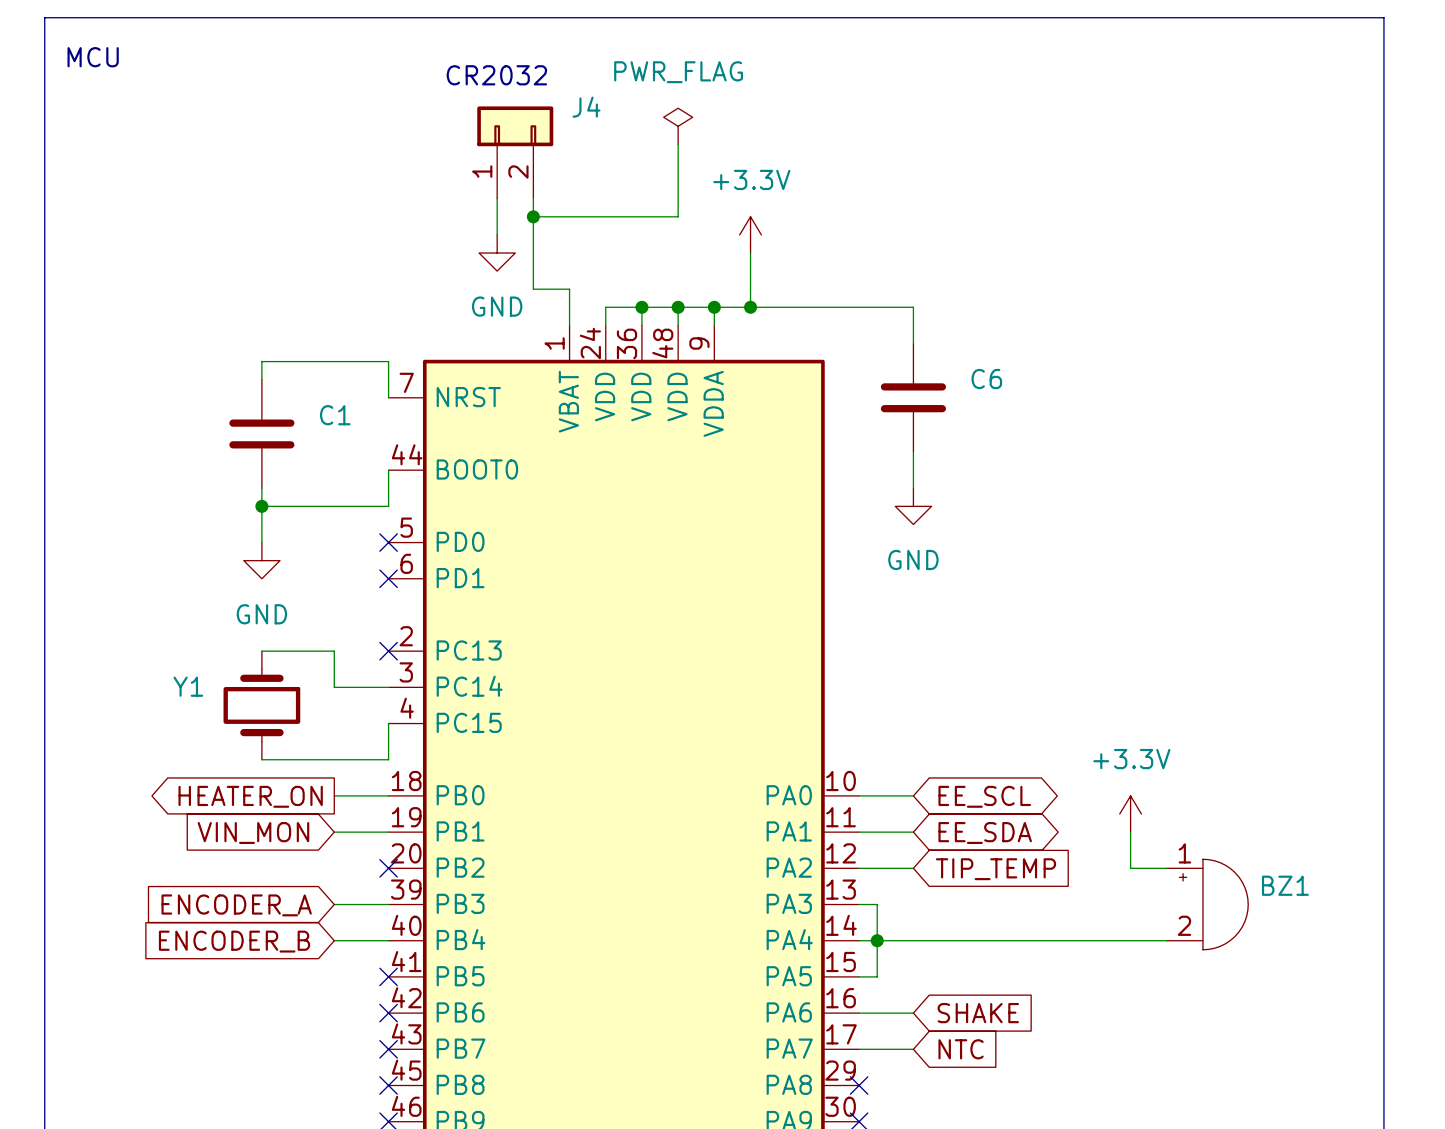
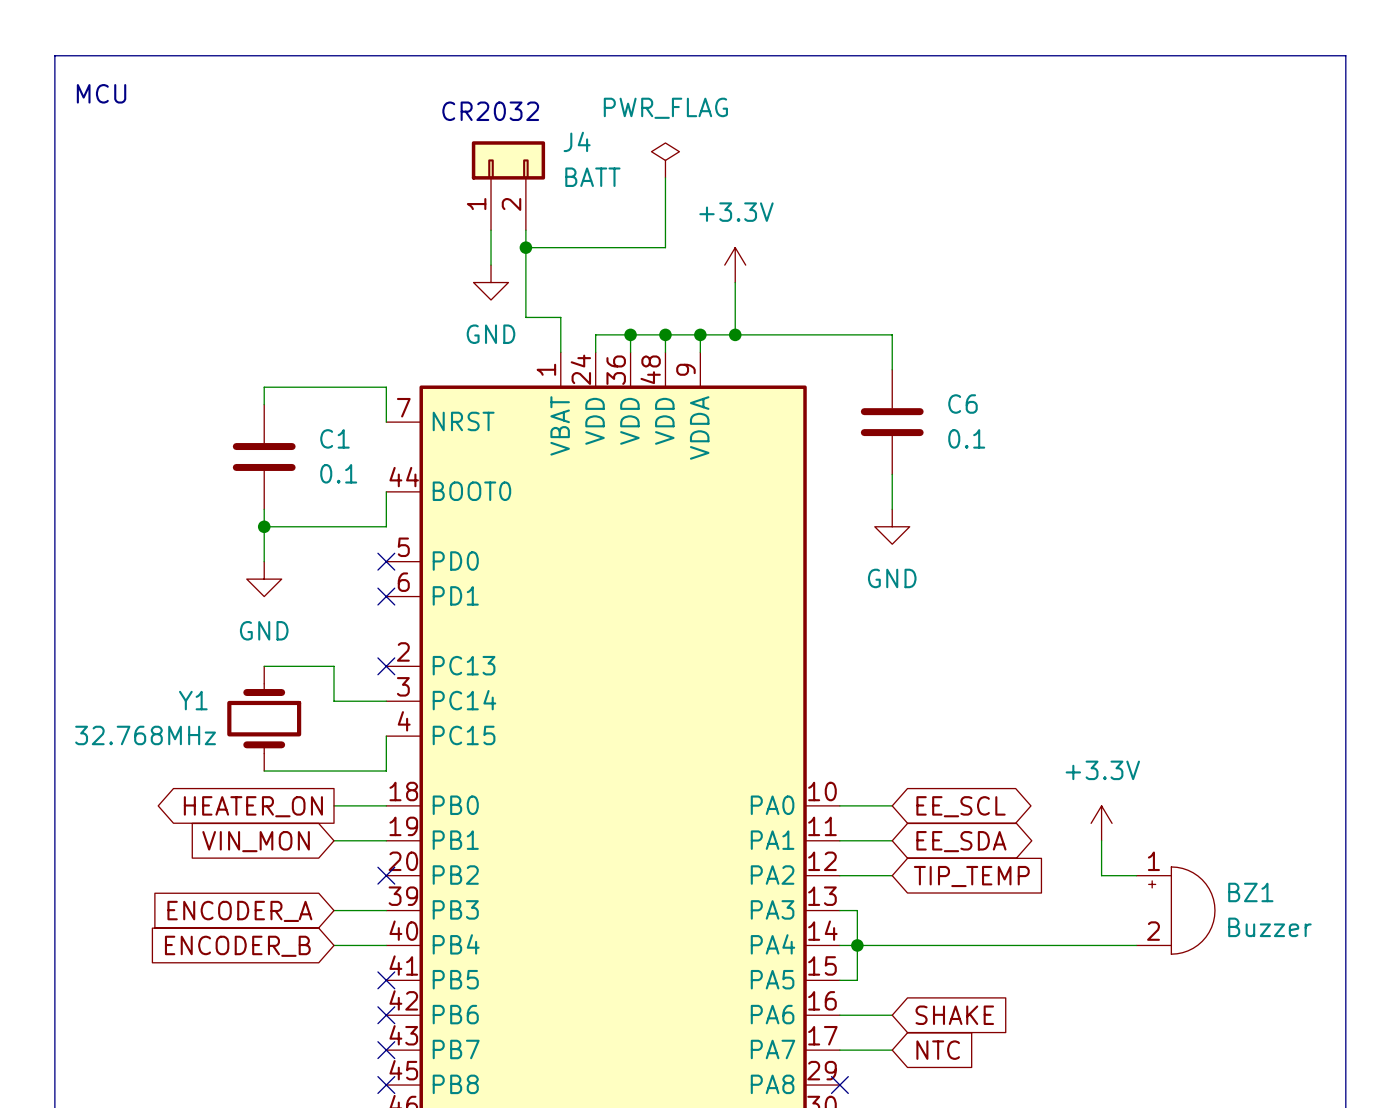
J4 value: none -> BATT (592, 177)
C6 value: none -> 0.1 (966, 438)
C1 value: none -> 0.1 (338, 473)
Y1 value: none -> 32.768MHz (145, 735)
BZ1 value: none -> Buzzer (1269, 927)

